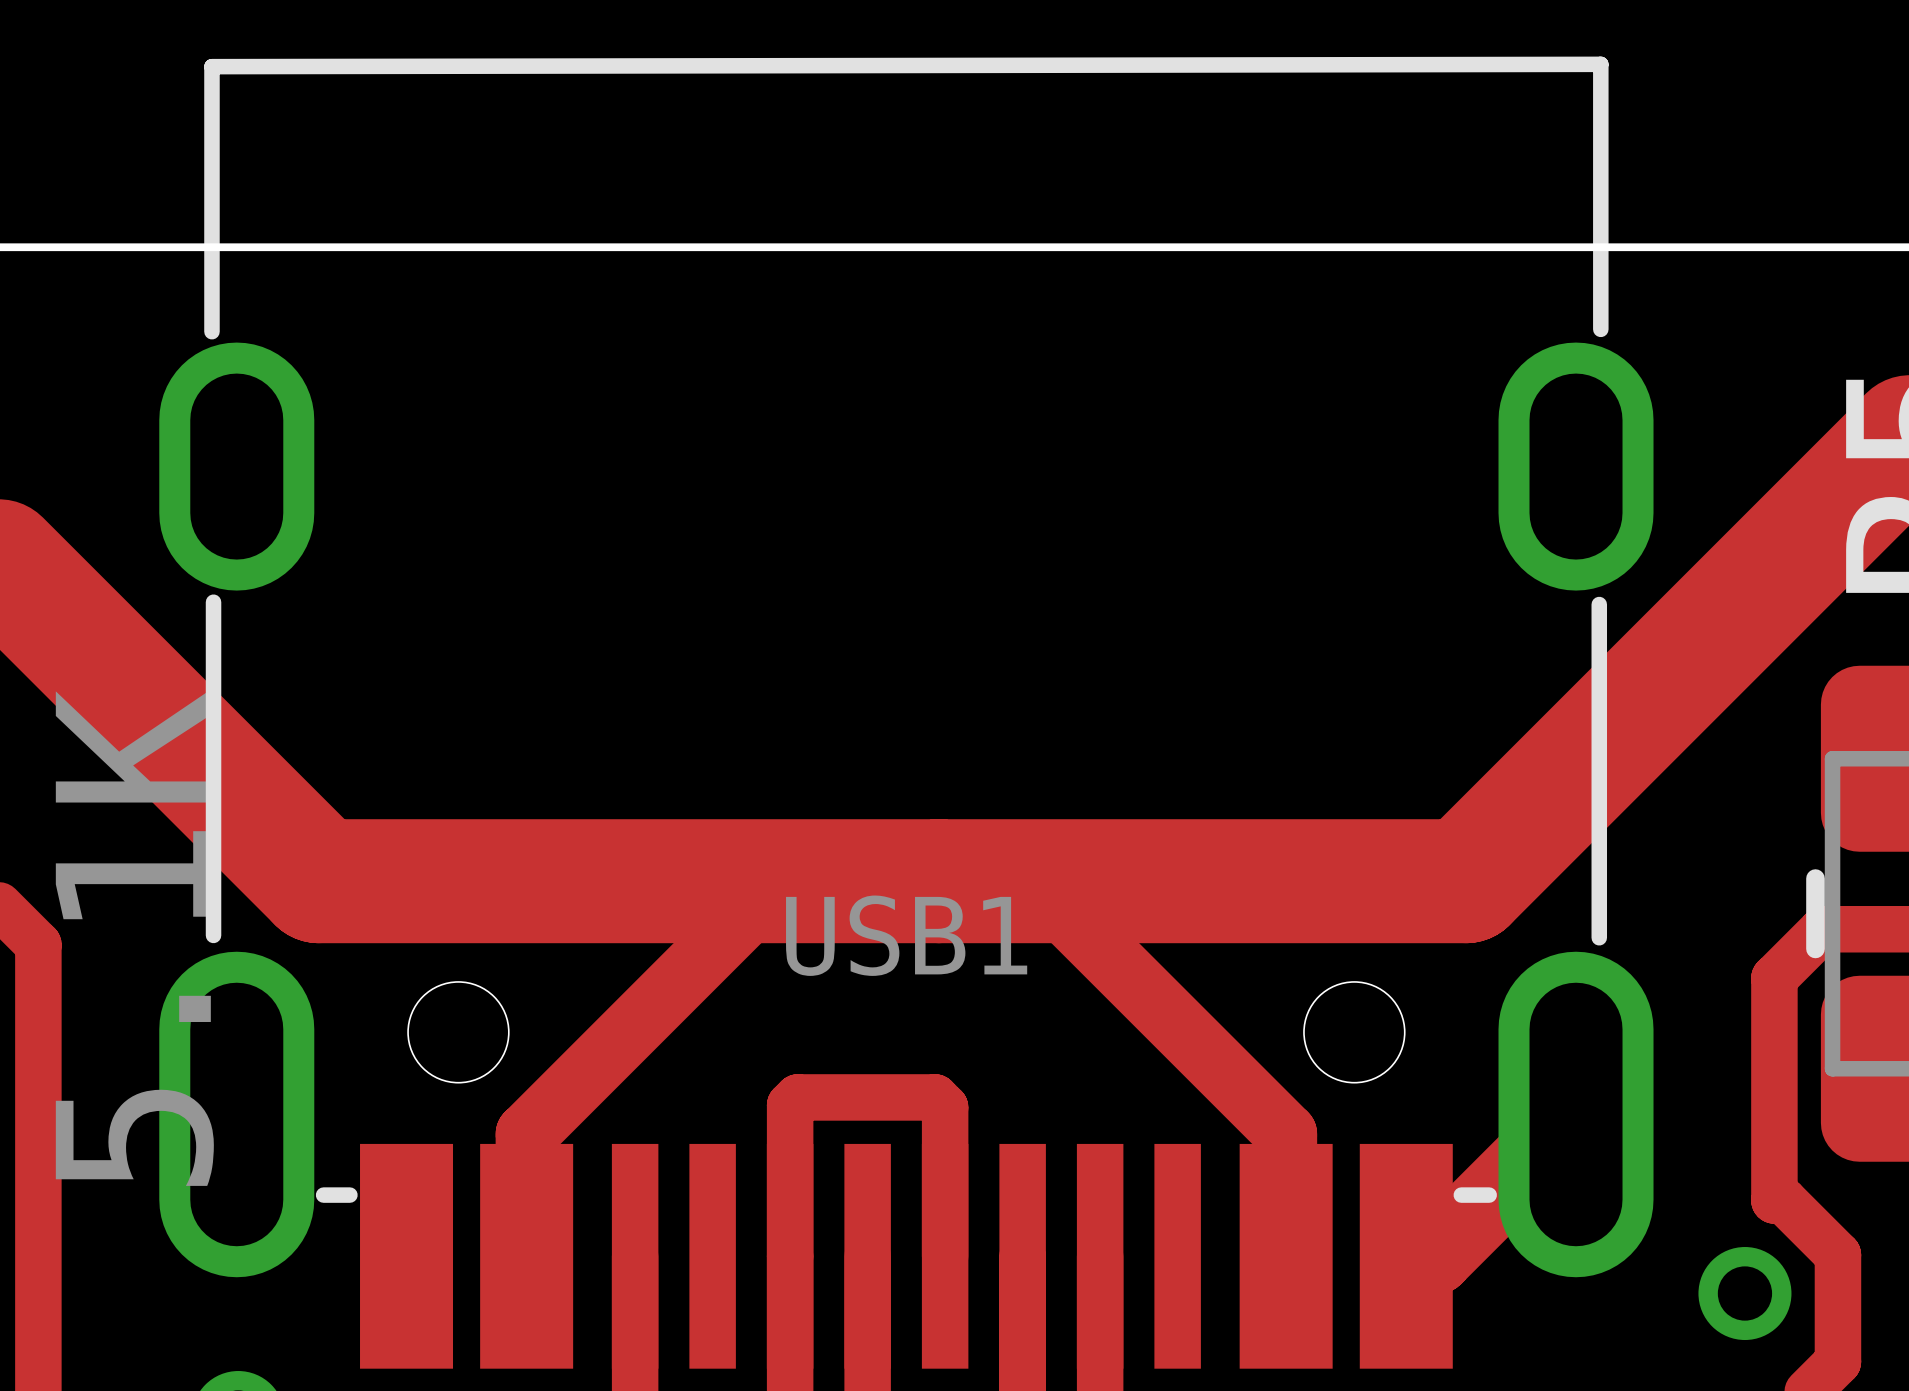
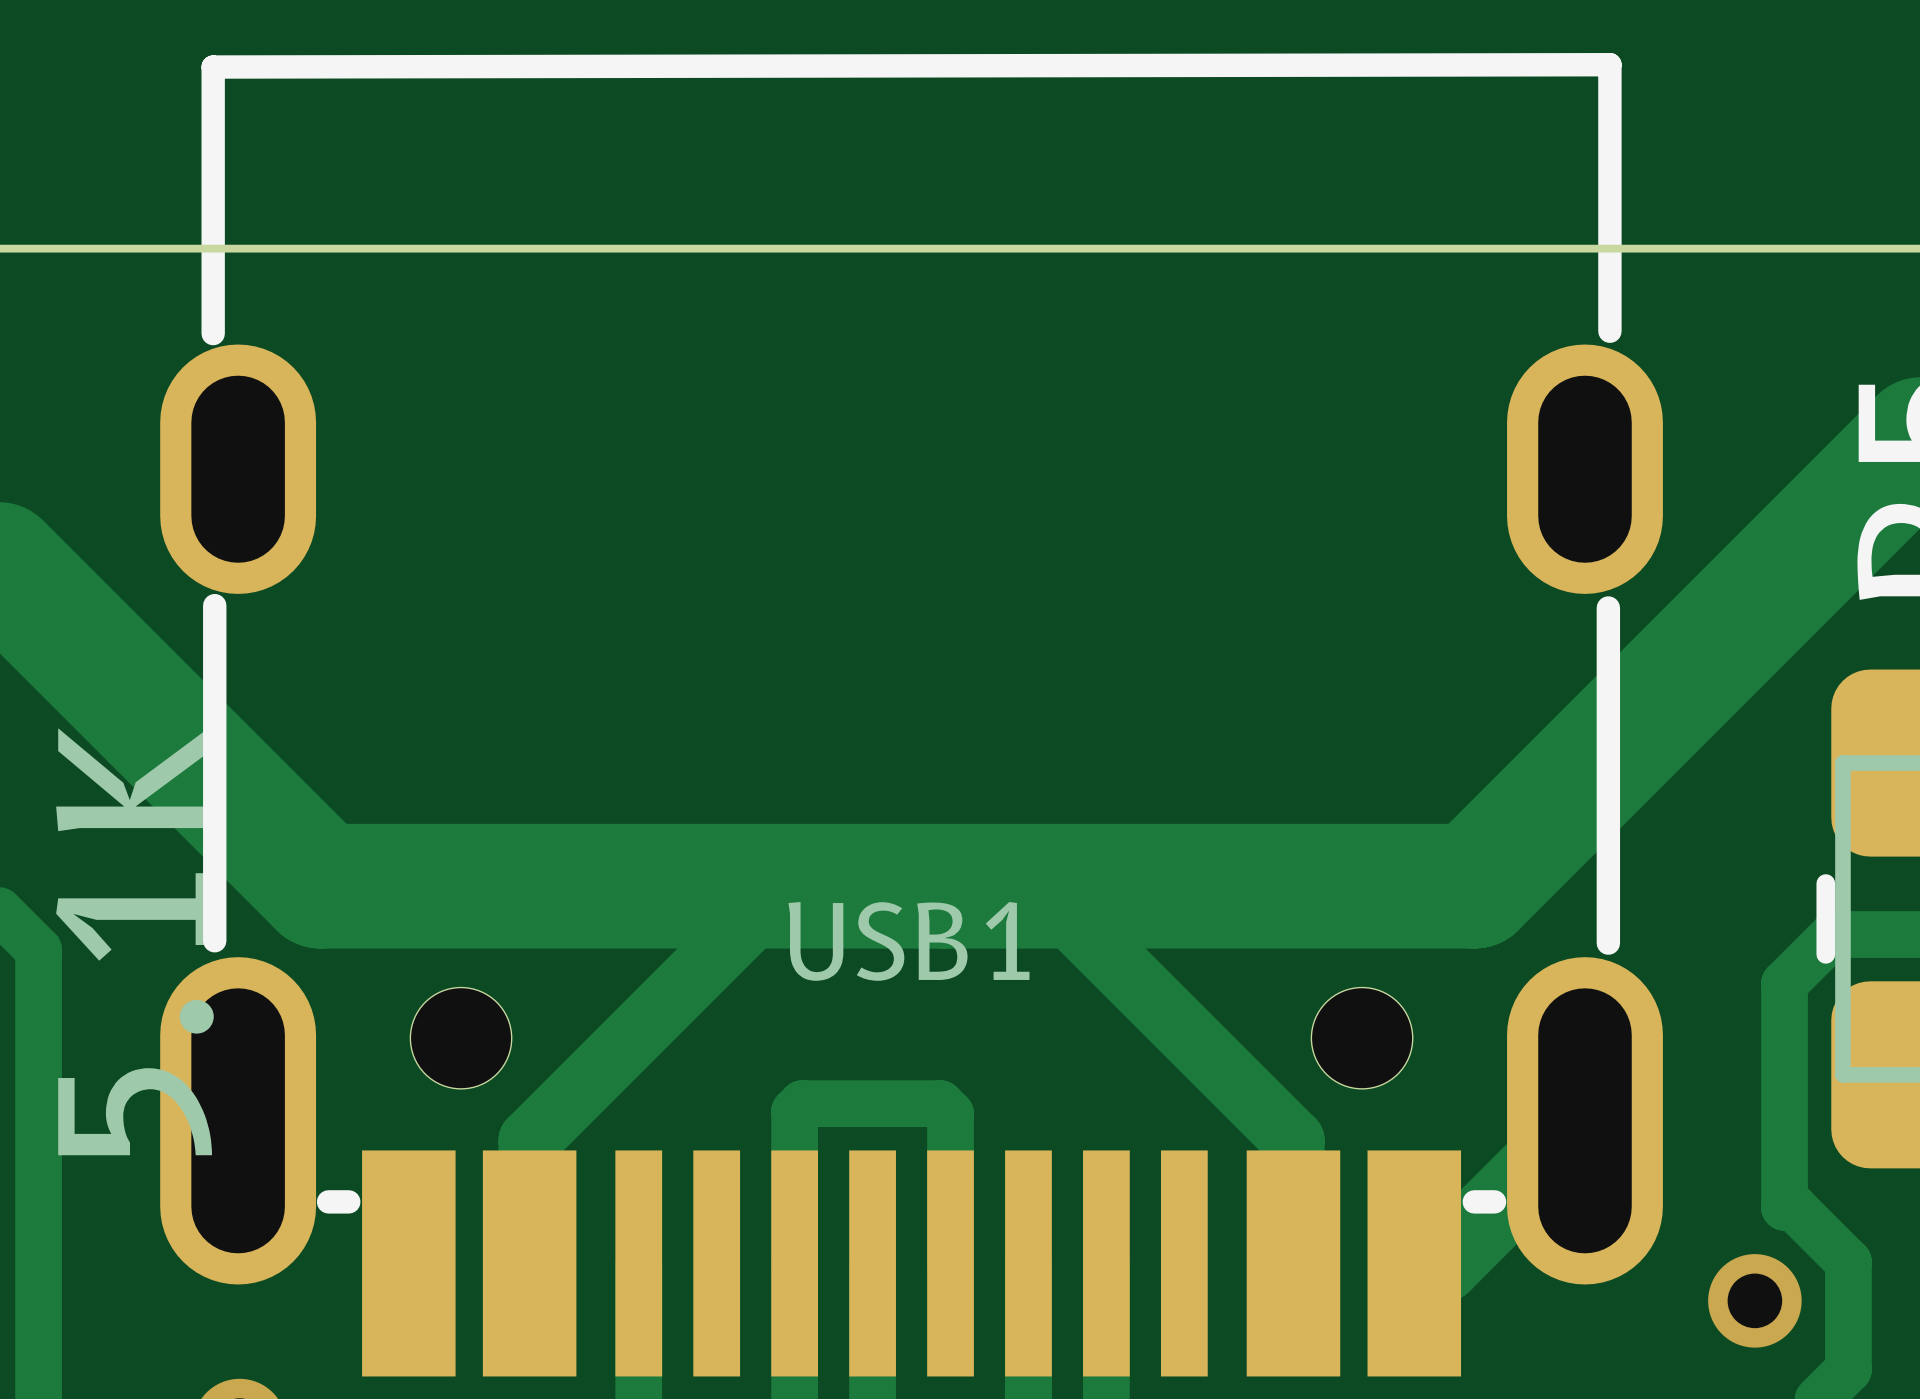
USB1 footprint: [159, 56, 1654, 1369] -> [160, 53, 1663, 1377]

